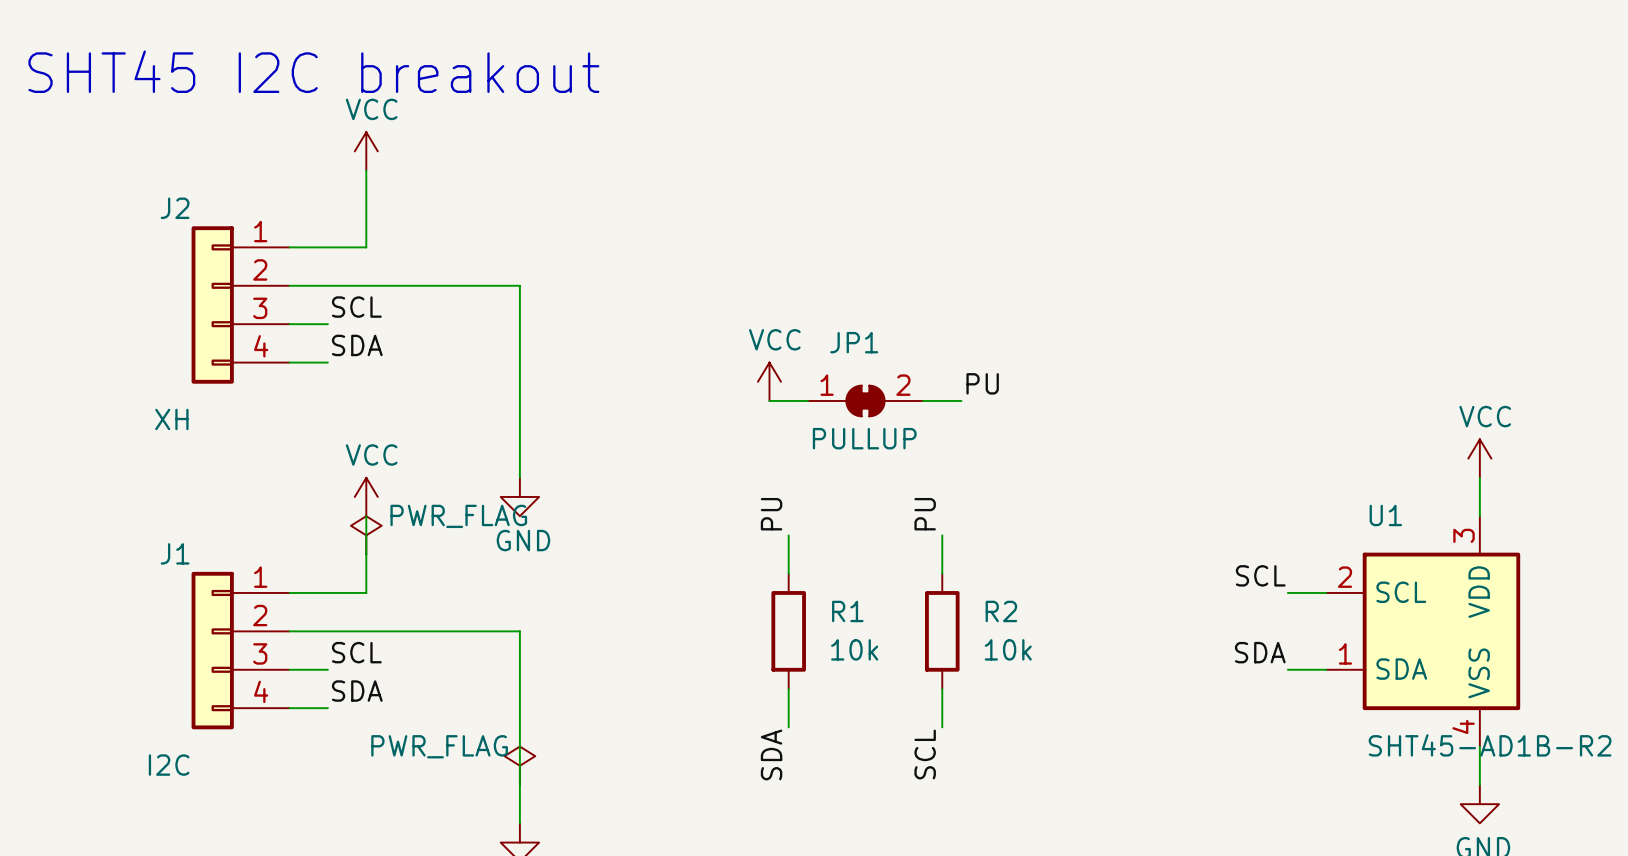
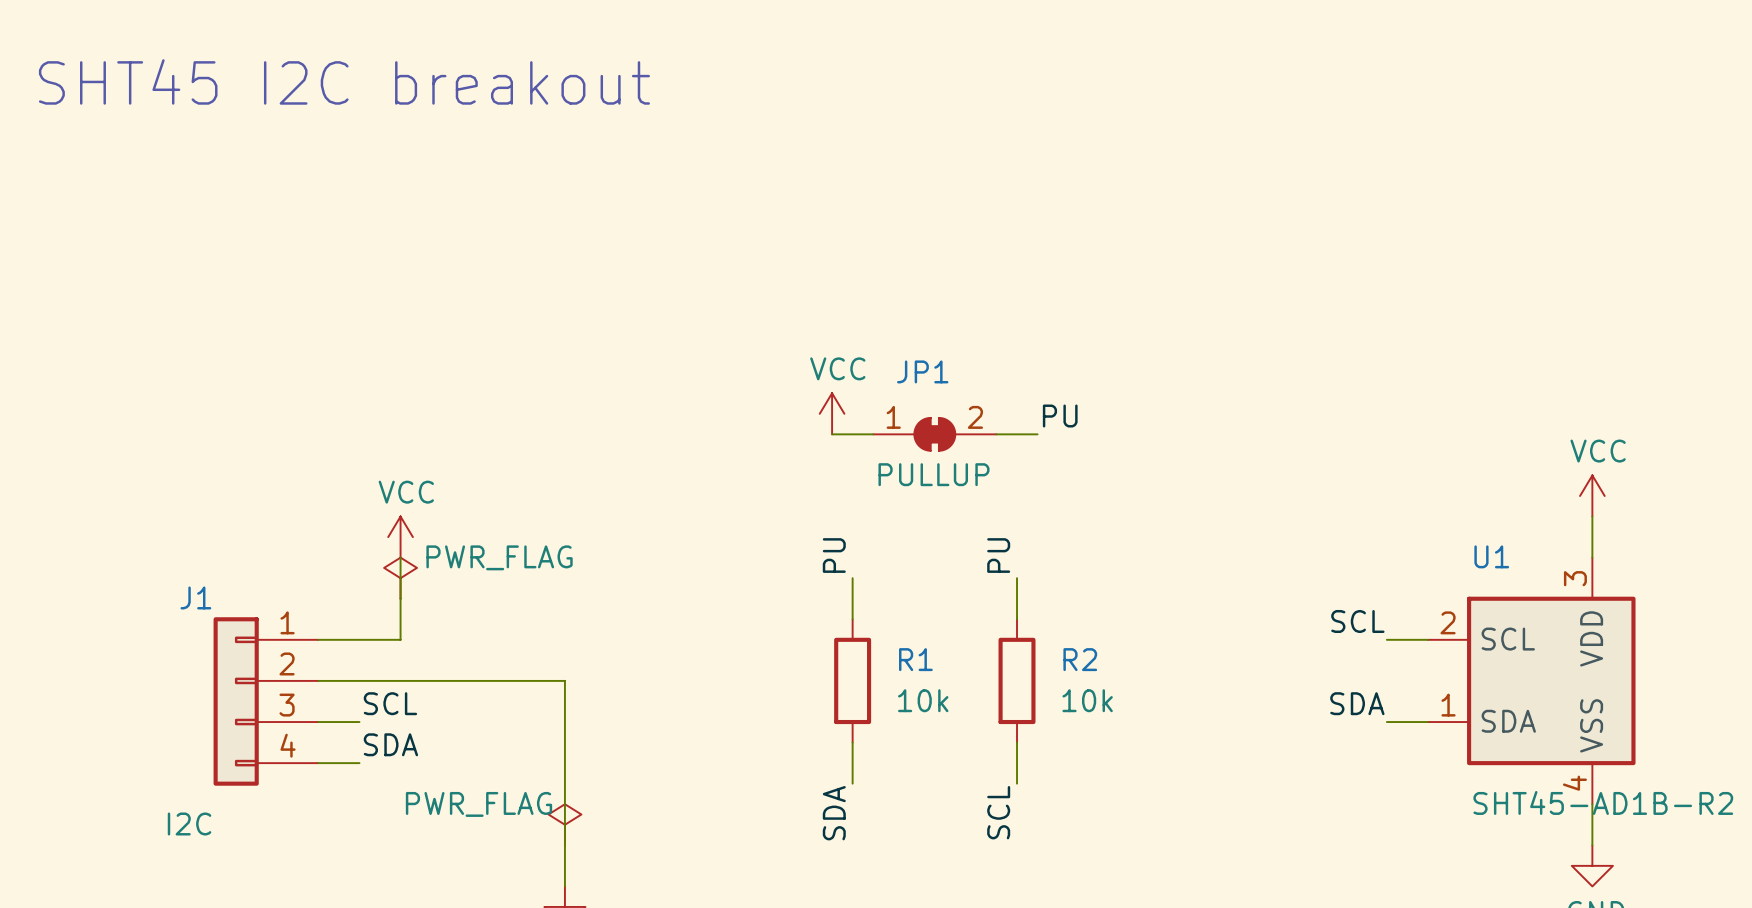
power symbol: VCC (366, 151) -> none
wire: (366, 170) (366, 247) (289, 247) -> none
wire: (289, 285) (519, 285) (519, 477) -> none
J2: XH (240, 304) -> none
label: SCL (356, 307) -> none
wire: (289, 324) (327, 324) -> none
label: SDA (357, 345) -> none
wire: (289, 362) (327, 362) -> none
power symbol: GND (519, 496) -> none

